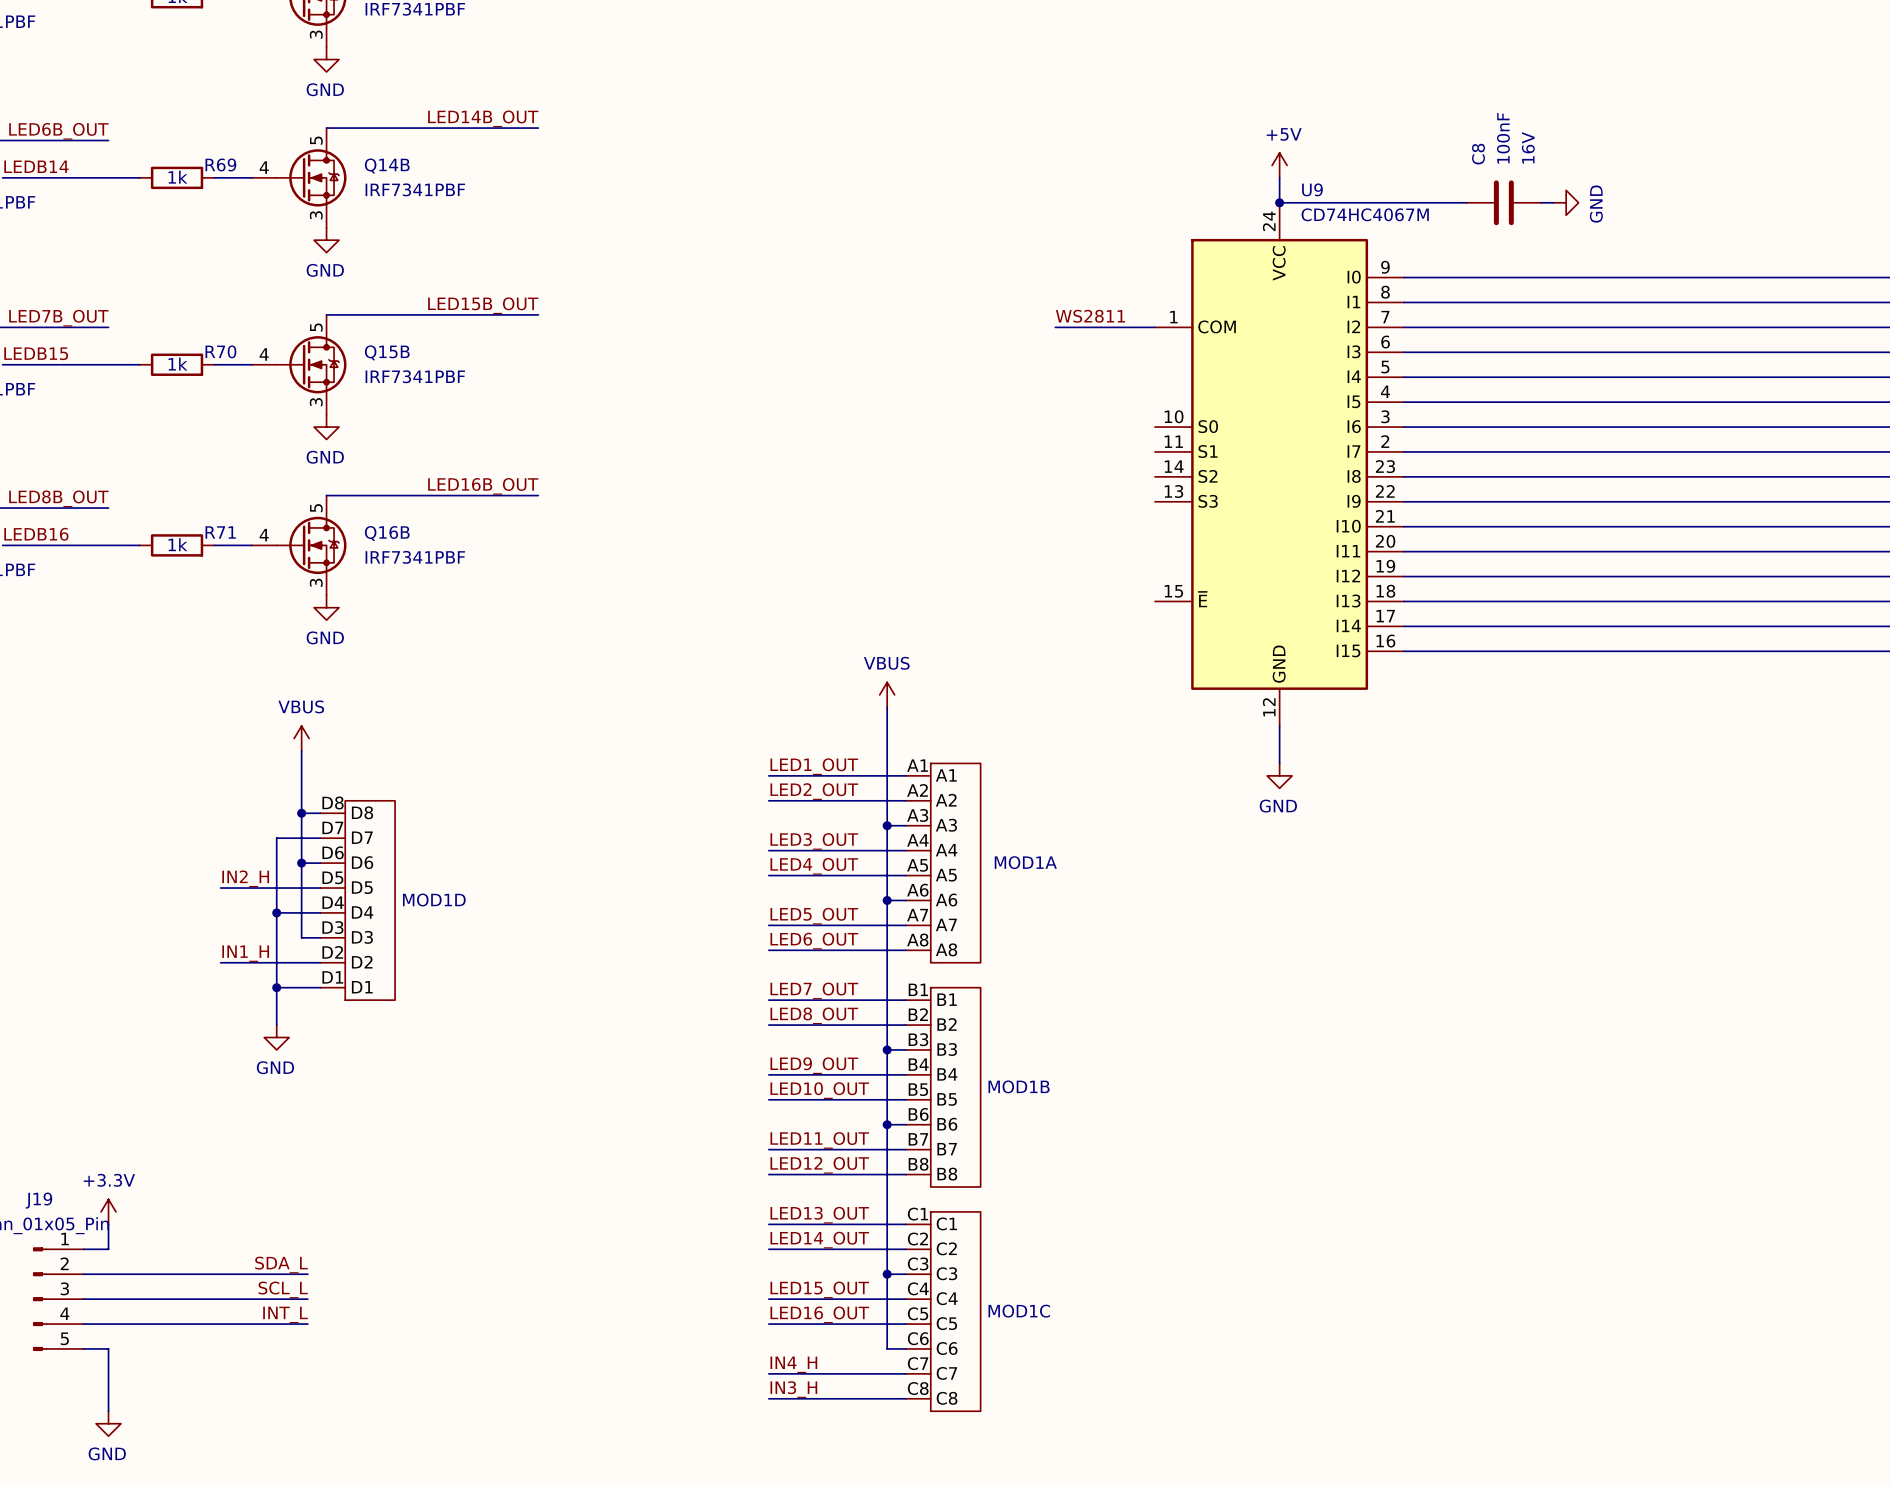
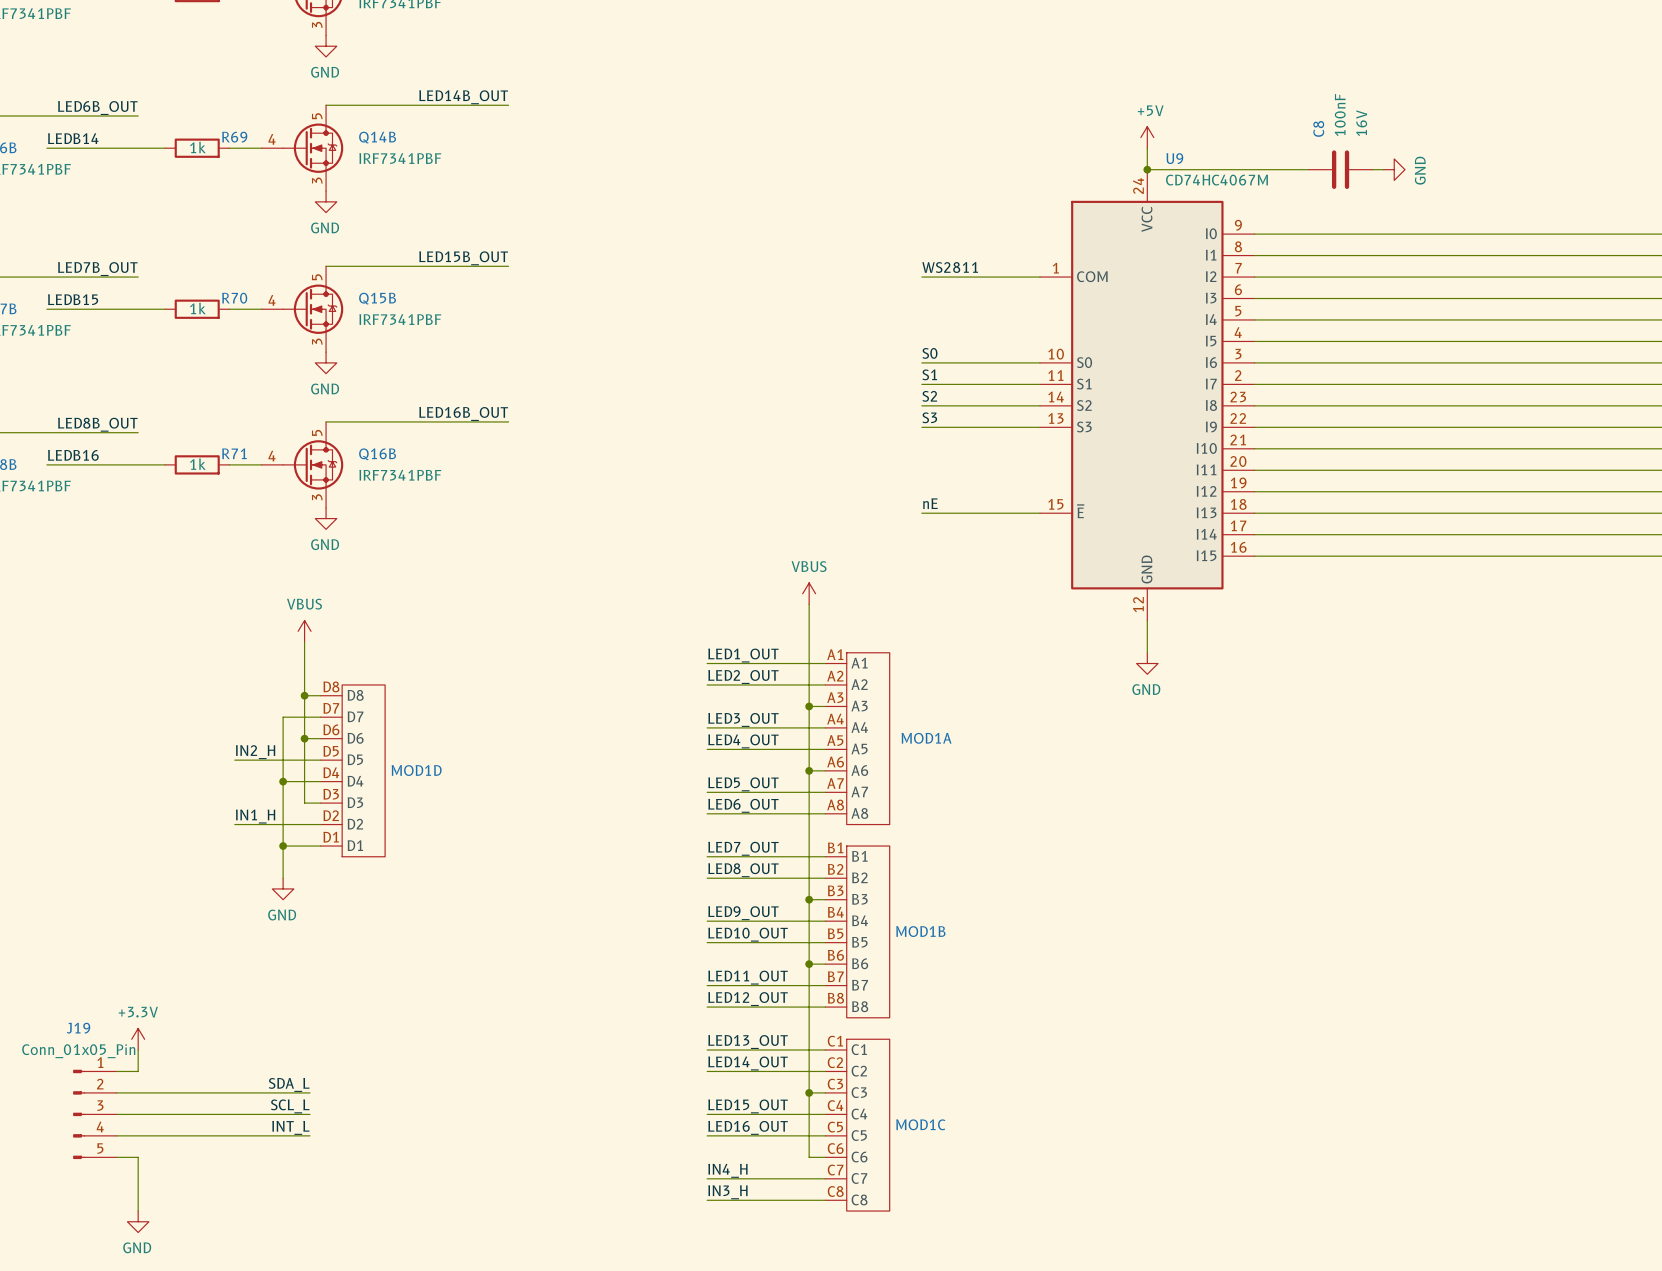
label position: WS2811 (1090, 316) -> WS2811 (950, 267)
wire: none -> (921, 277) (954, 277)
label: none -> S0 (929, 353)
wire: none -> (921, 362) (1039, 362)
label: none -> S1 (929, 374)
wire: none -> (921, 384) (1039, 384)
label: none -> S2 (929, 396)
wire: none -> (921, 405) (1039, 405)
label: none -> S3 (929, 417)
wire: none -> (921, 427) (1039, 427)
label: none -> nE (930, 503)
wire: none -> (921, 513) (1039, 513)

